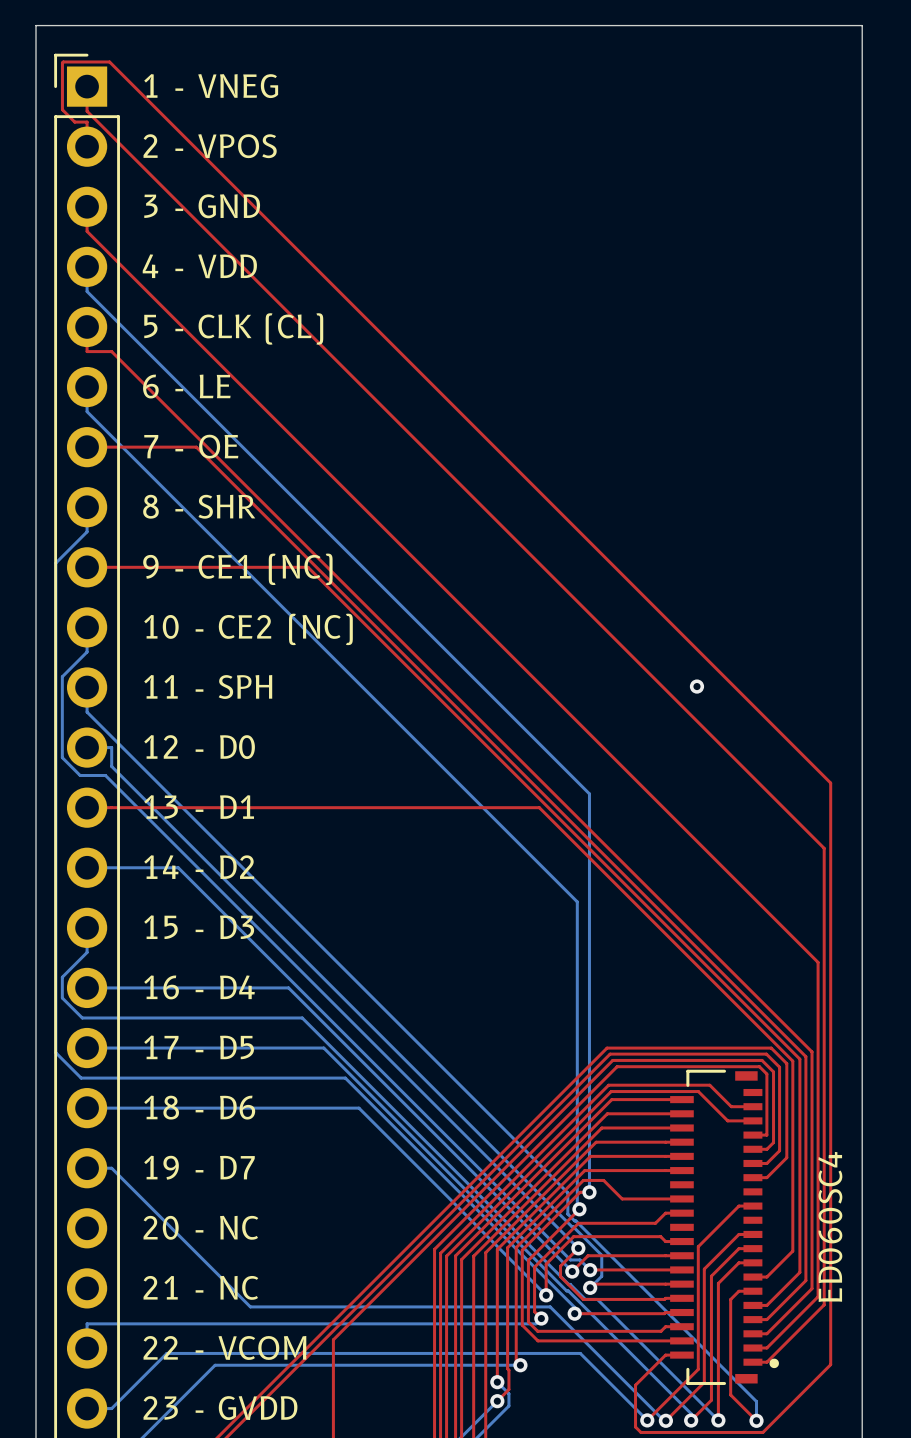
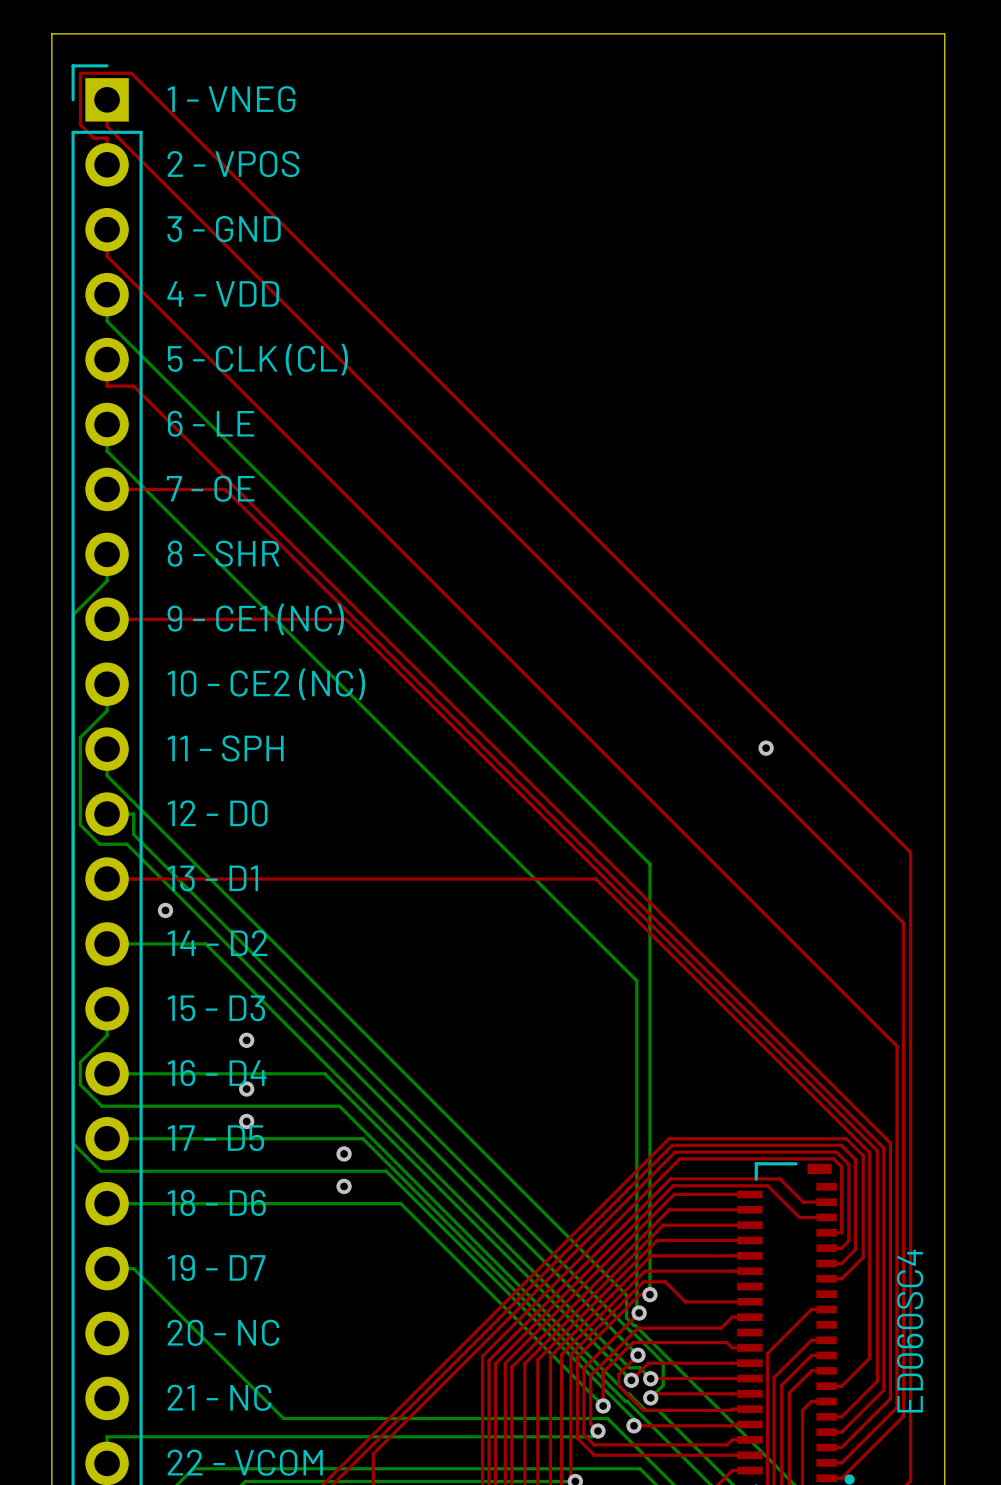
via: none -> (165, 910)
via: none -> (246, 1040)
via: none -> (246, 1089)
via: none -> (246, 1121)
via: none -> (344, 1153)
via: none -> (344, 1186)

